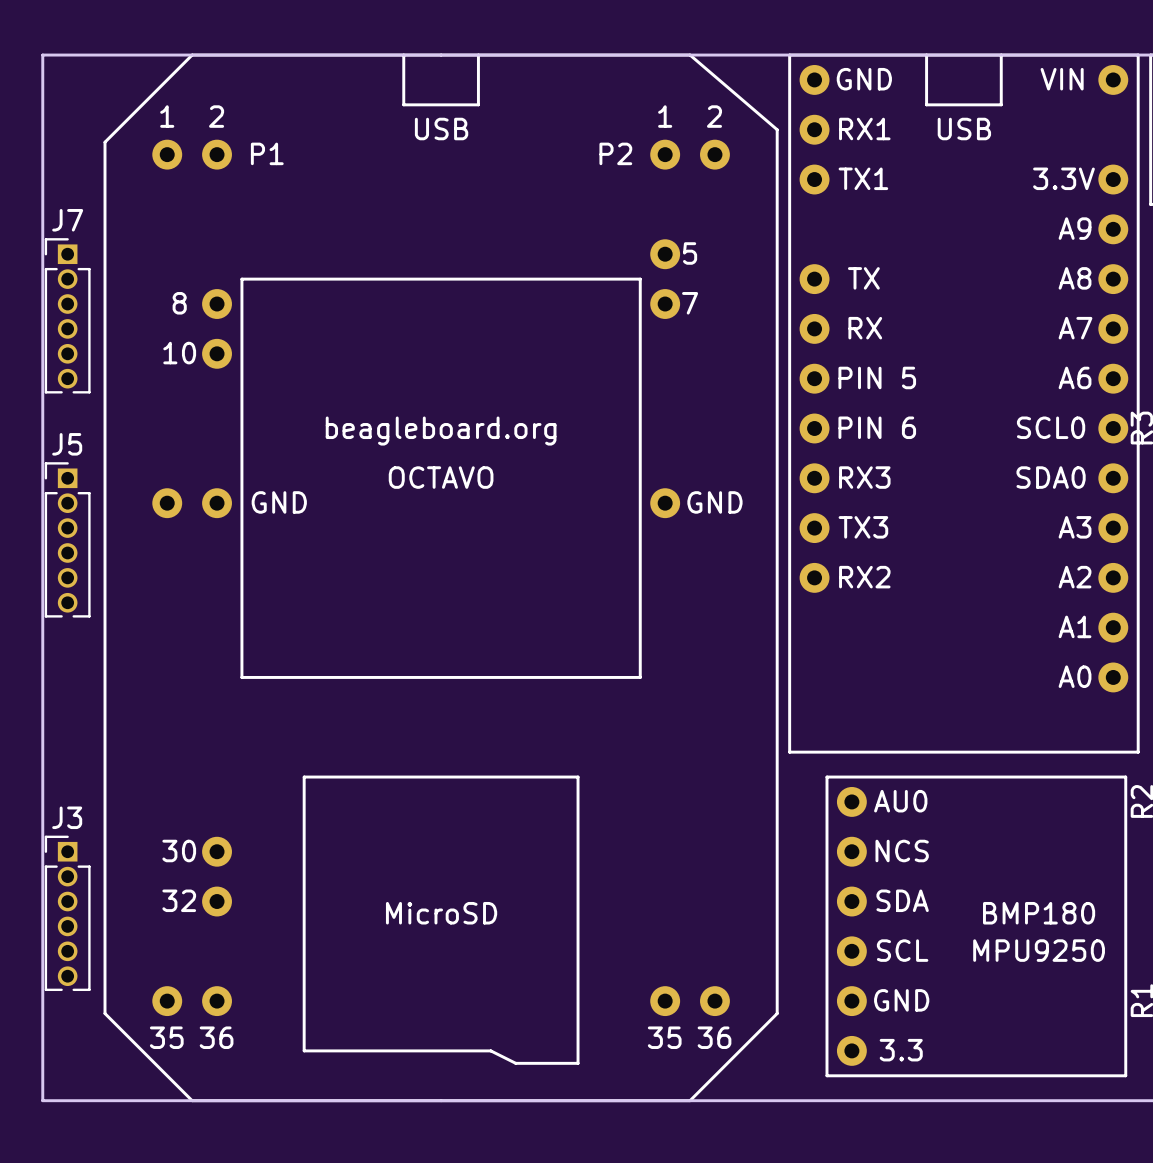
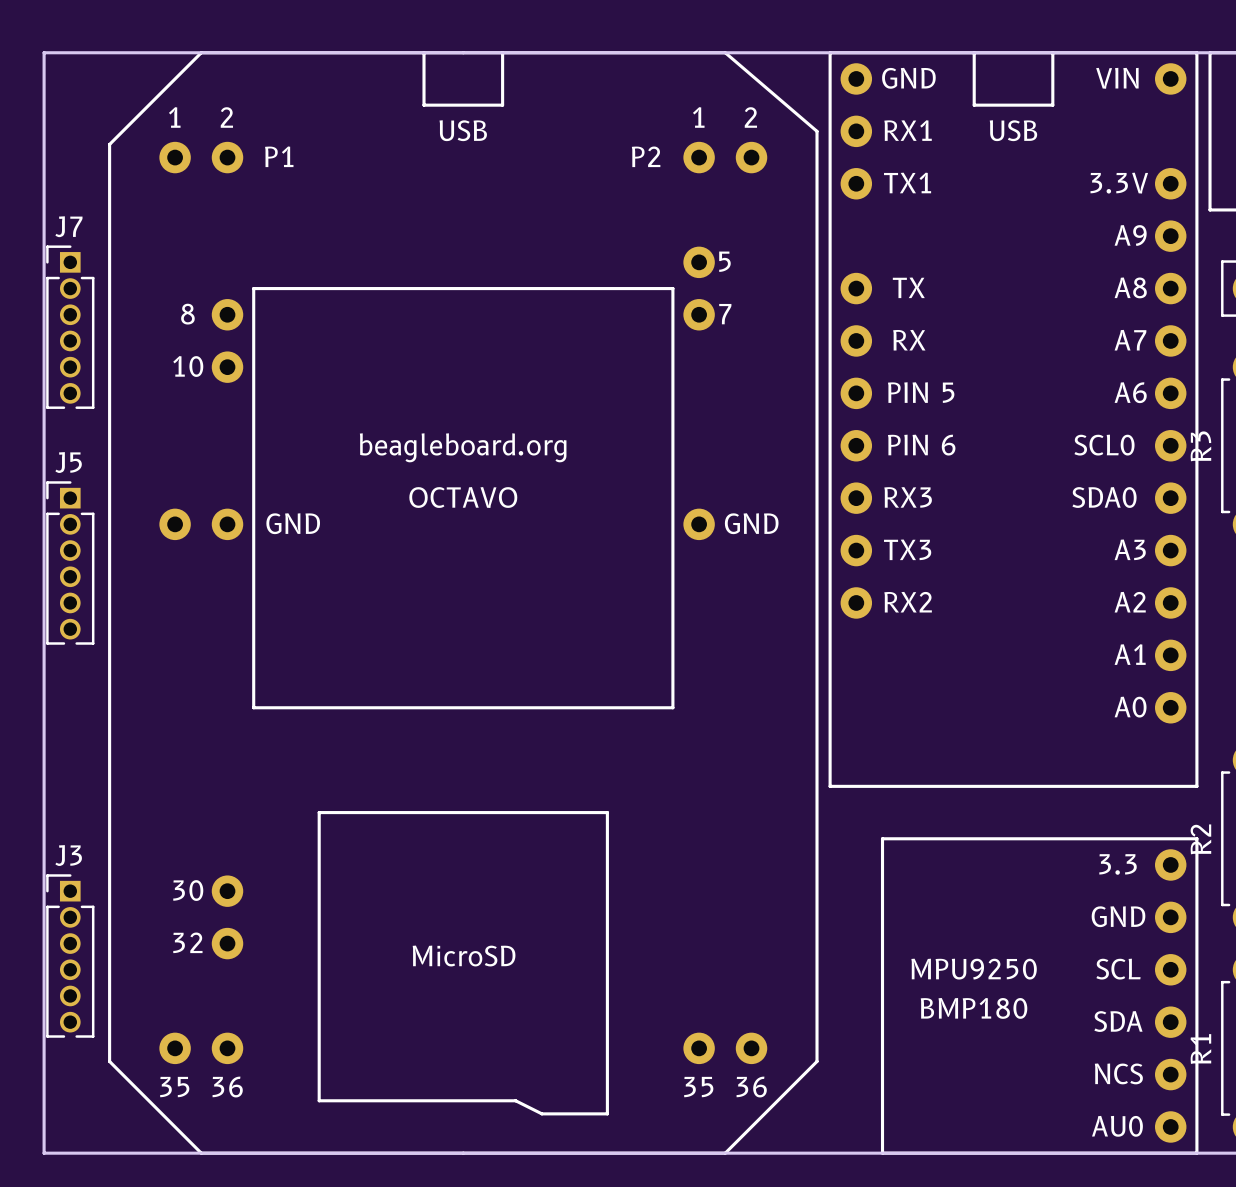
part rotation: 0° (976, 926) -> 180° (1039, 995)

